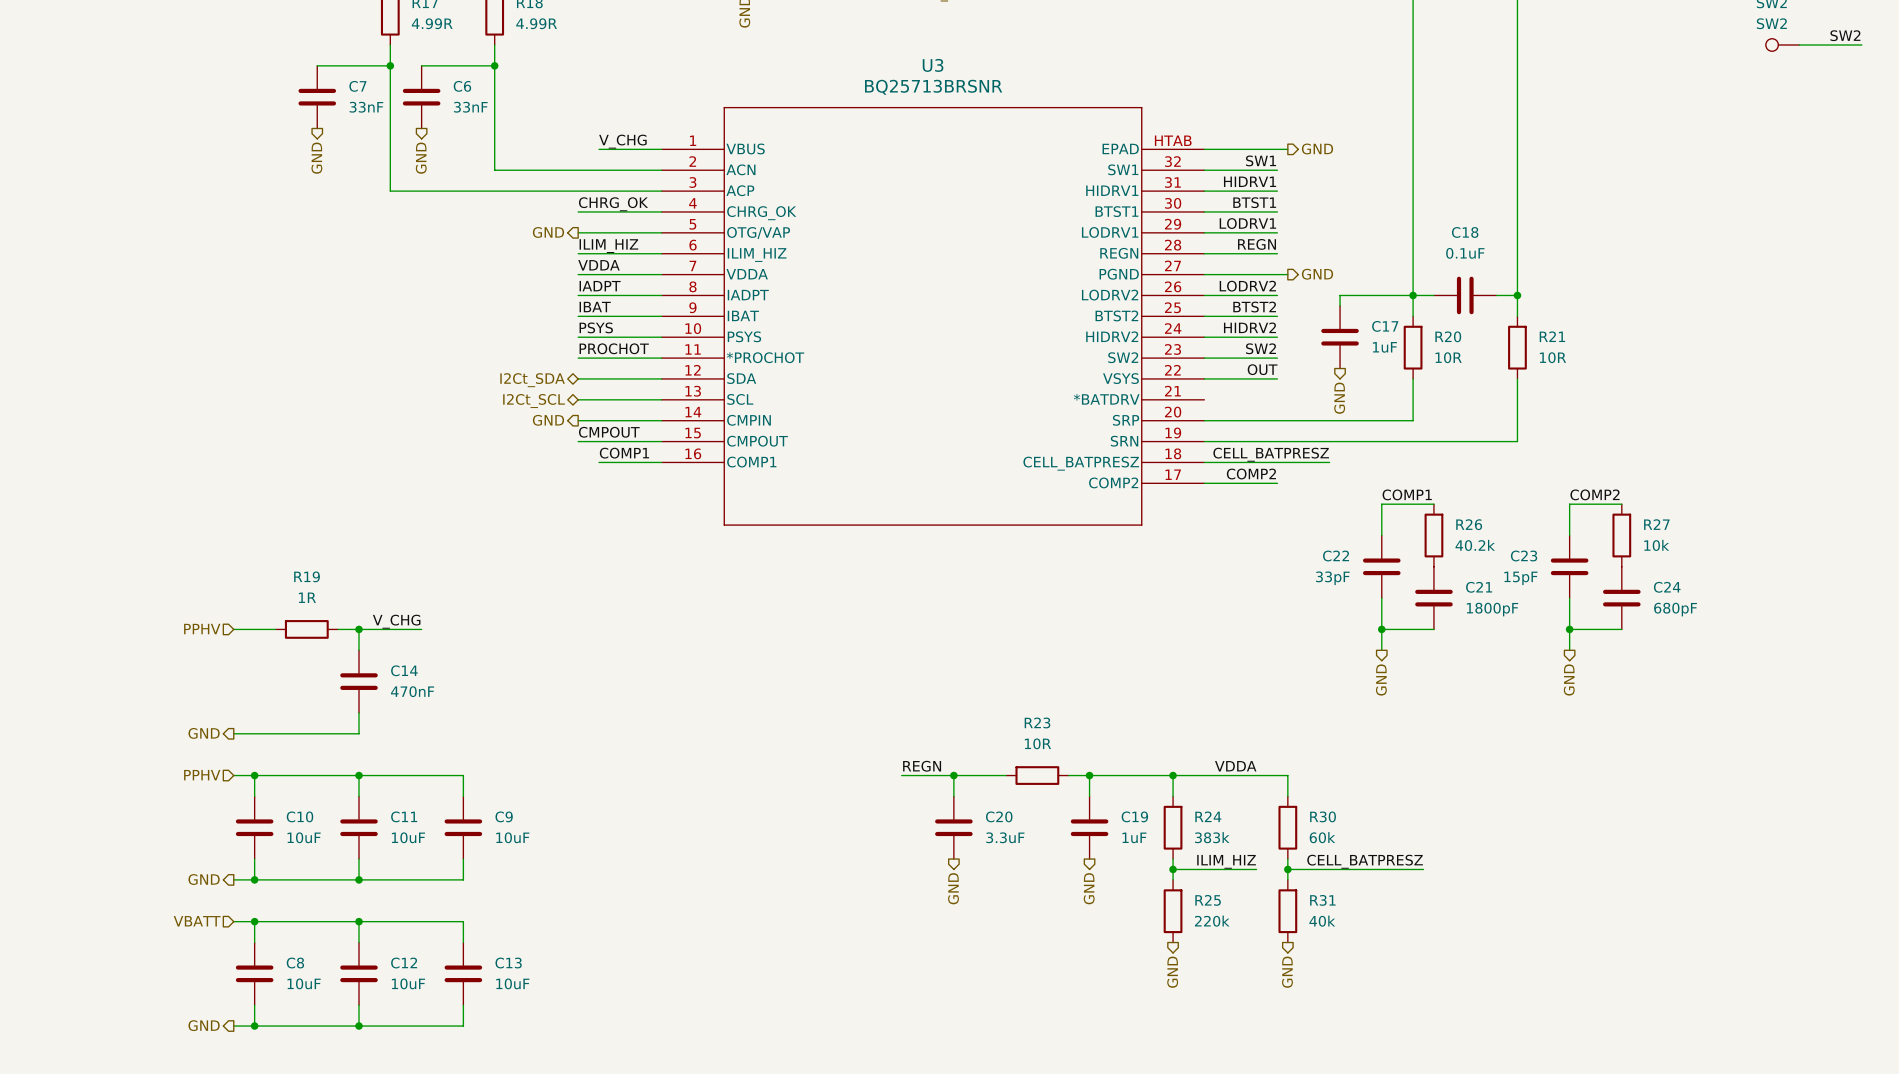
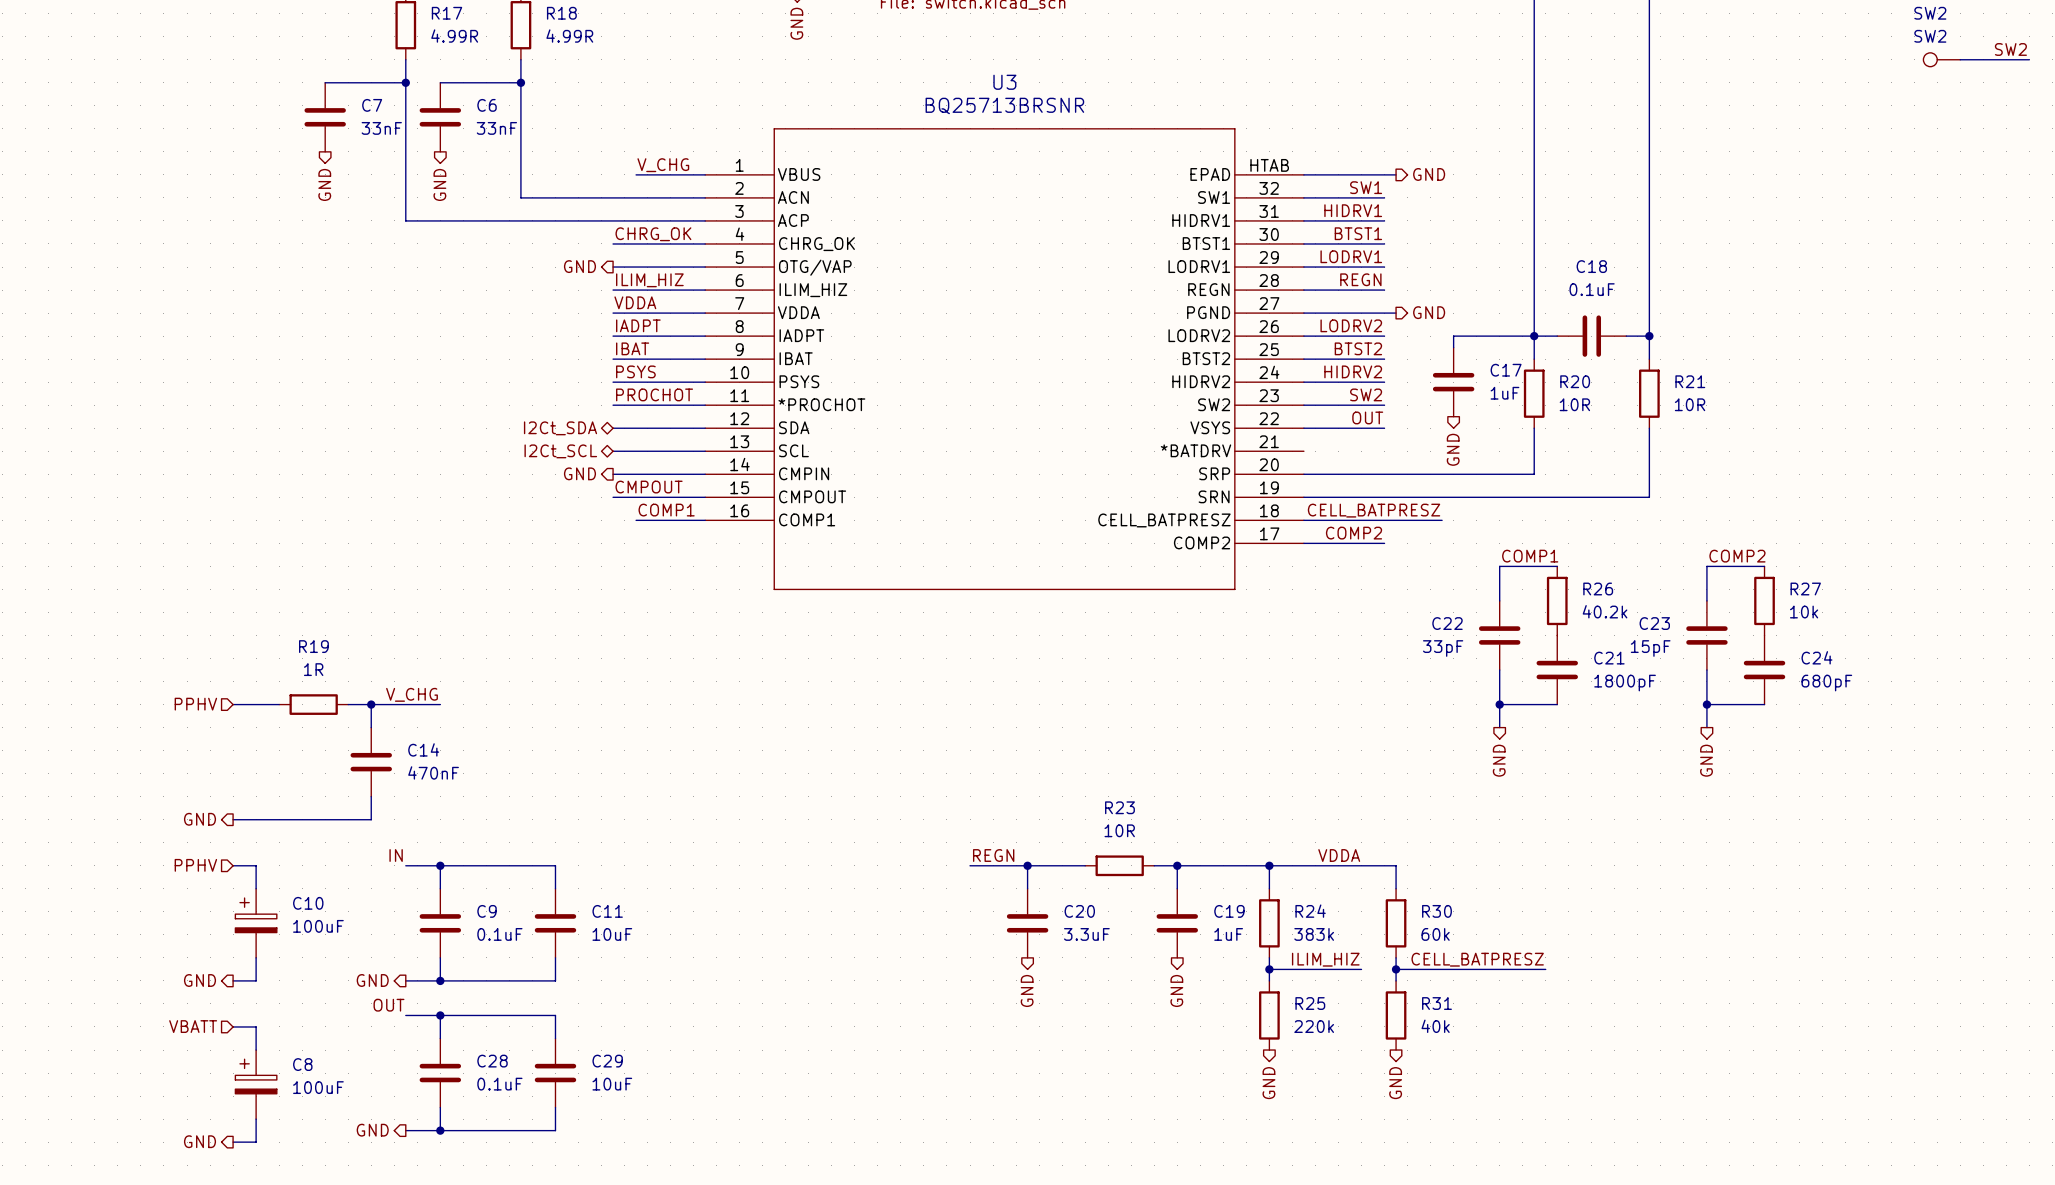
label: none -> IN (396, 855)
wire: (254, 775) (390, 775) -> none
junction: (254, 775) -> none
wire: (359, 775) (359, 796) -> (440, 865) (440, 888)
junction: (359, 775) -> none
junction: none -> (440, 865)
wire: (463, 775) (463, 796) -> (486, 865) (555, 865) (555, 888)
C10 symbol: [235, 796, 274, 860] -> [235, 888, 277, 958]
C11 position: (359, 827) -> (555, 923)
C9 position: (463, 827) -> (440, 923)
C10 value: 10uF (304, 837) -> 100uF (318, 926)
C9 value: 10uF (512, 837) -> 0.1uF (499, 934)
wire: (359, 859) (359, 879) -> (440, 957) (440, 980)
wire: (463, 859) (463, 879) -> (555, 957) (555, 980) (486, 980)
wire: (254, 879) (390, 879) -> none
junction: (254, 879) -> none
junction: (359, 879) -> none
hierarchical label: none -> GND (372, 980)
junction: none -> (440, 980)
label: none -> OUT (388, 1005)
wire: none -> (405, 1015) (555, 1015) (555, 1038)
junction: none -> (440, 1015)
wire: (254, 921) (463, 921) (463, 942) -> none
junction: (254, 921) -> none
wire: (359, 921) (359, 942) -> (440, 1015) (440, 1038)
junction: (359, 921) -> none
C8 symbol: [235, 942, 274, 1006] -> [235, 1050, 277, 1120]
C28: none -> 0.1uF (440, 1073)
C29: none -> 10uF (555, 1073)
C12: 10uF (359, 973) -> none
C13: 10uF (463, 973) -> none
C8 value: 10uF (304, 983) -> 100uF (318, 1087)
wire: none -> (555, 1107) (555, 1130) (405, 1130)
wire: (359, 1005) (359, 1026) -> (440, 1107) (440, 1130)
wire: (463, 1005) (463, 1026) (254, 1026) -> none
hierarchical label: none -> GND (372, 1130)
junction: none -> (440, 1130)
junction: (254, 1026) -> none
junction: (359, 1026) -> none

